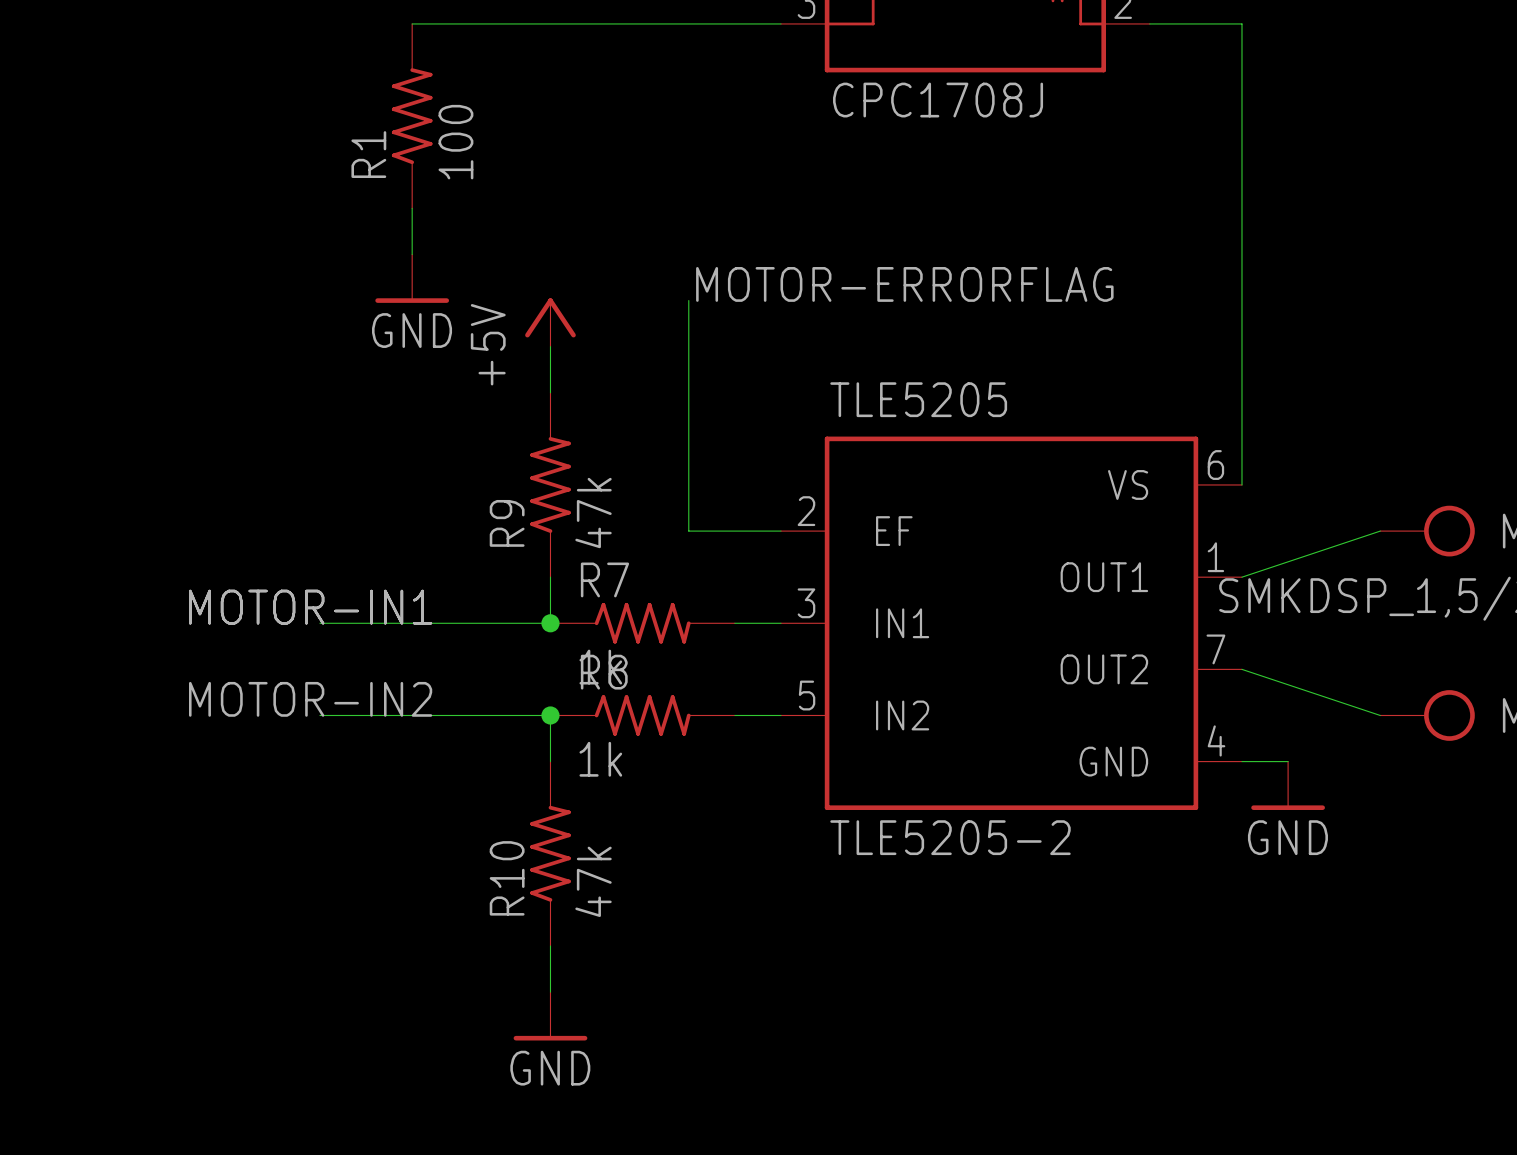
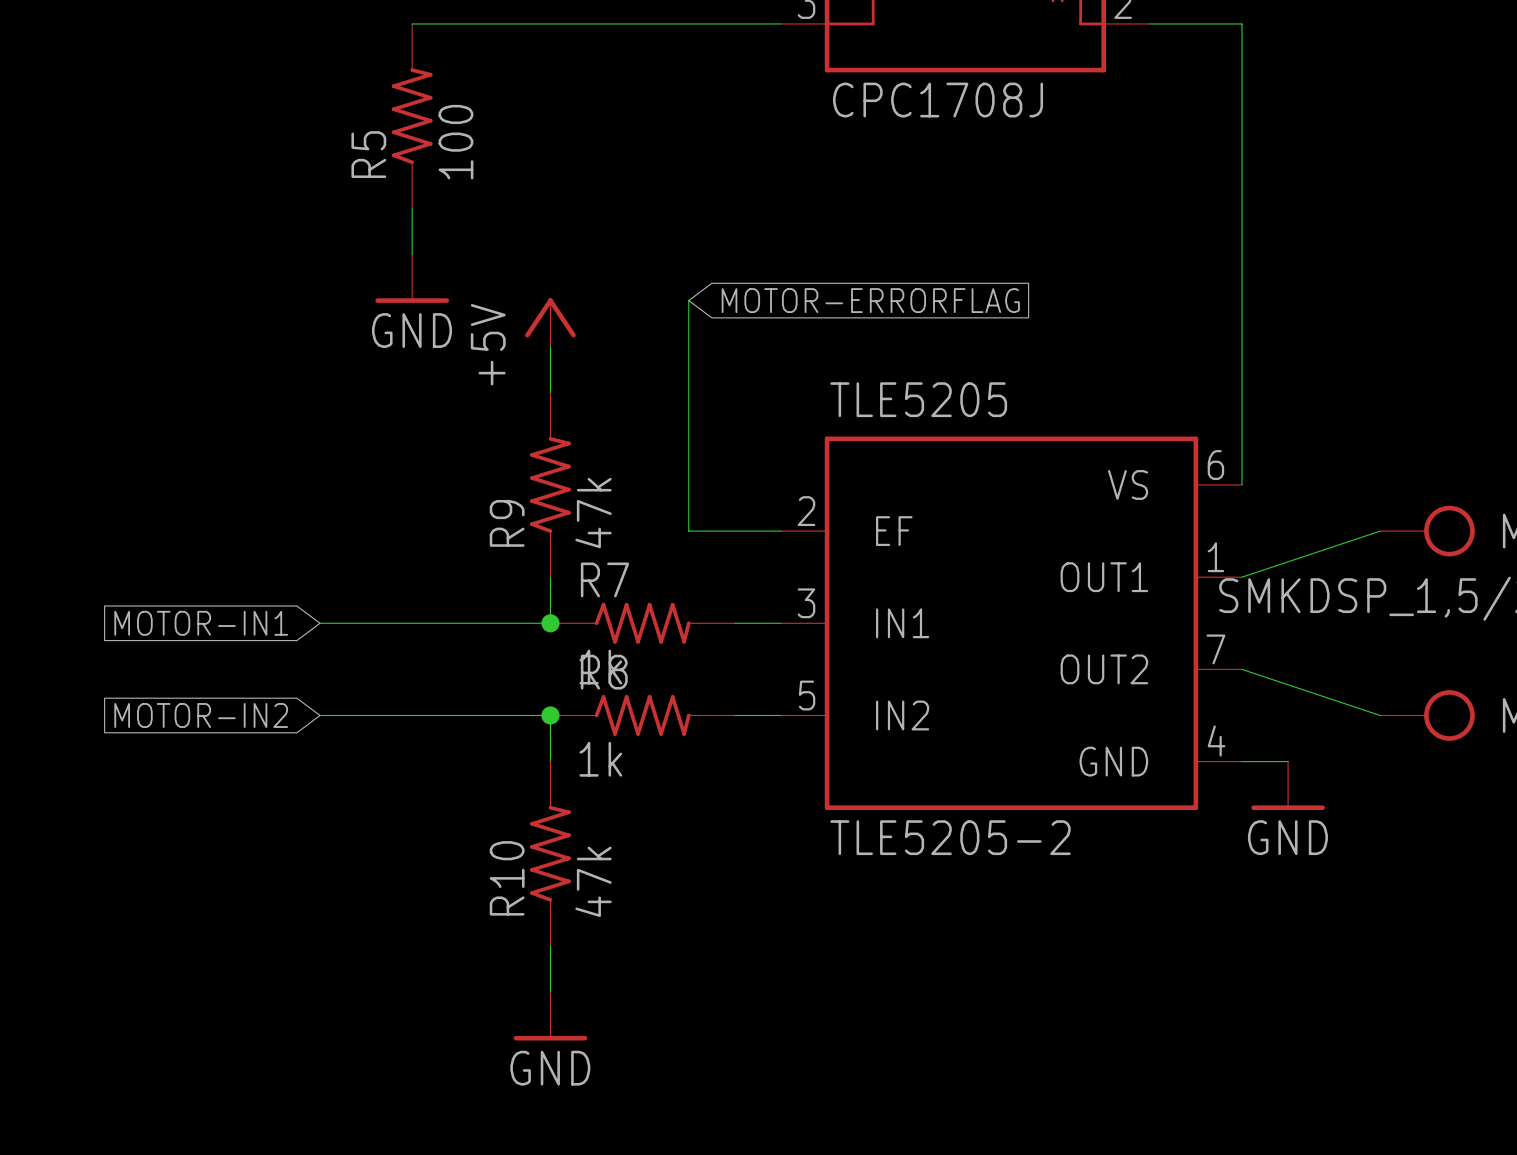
R1 name: R1 (368, 154) -> R5 (368, 154)
label: MOTOR-ERRORFLAG (904, 284) -> none
global label: none -> MOTOR-ERRORFLAG (870, 300)
label: MOTOR-IN1 (310, 607) -> none
global label: none -> MOTOR-IN1 (201, 623)
label: MOTOR-IN2 (310, 699) -> none
global label: none -> MOTOR-IN2 (201, 715)

